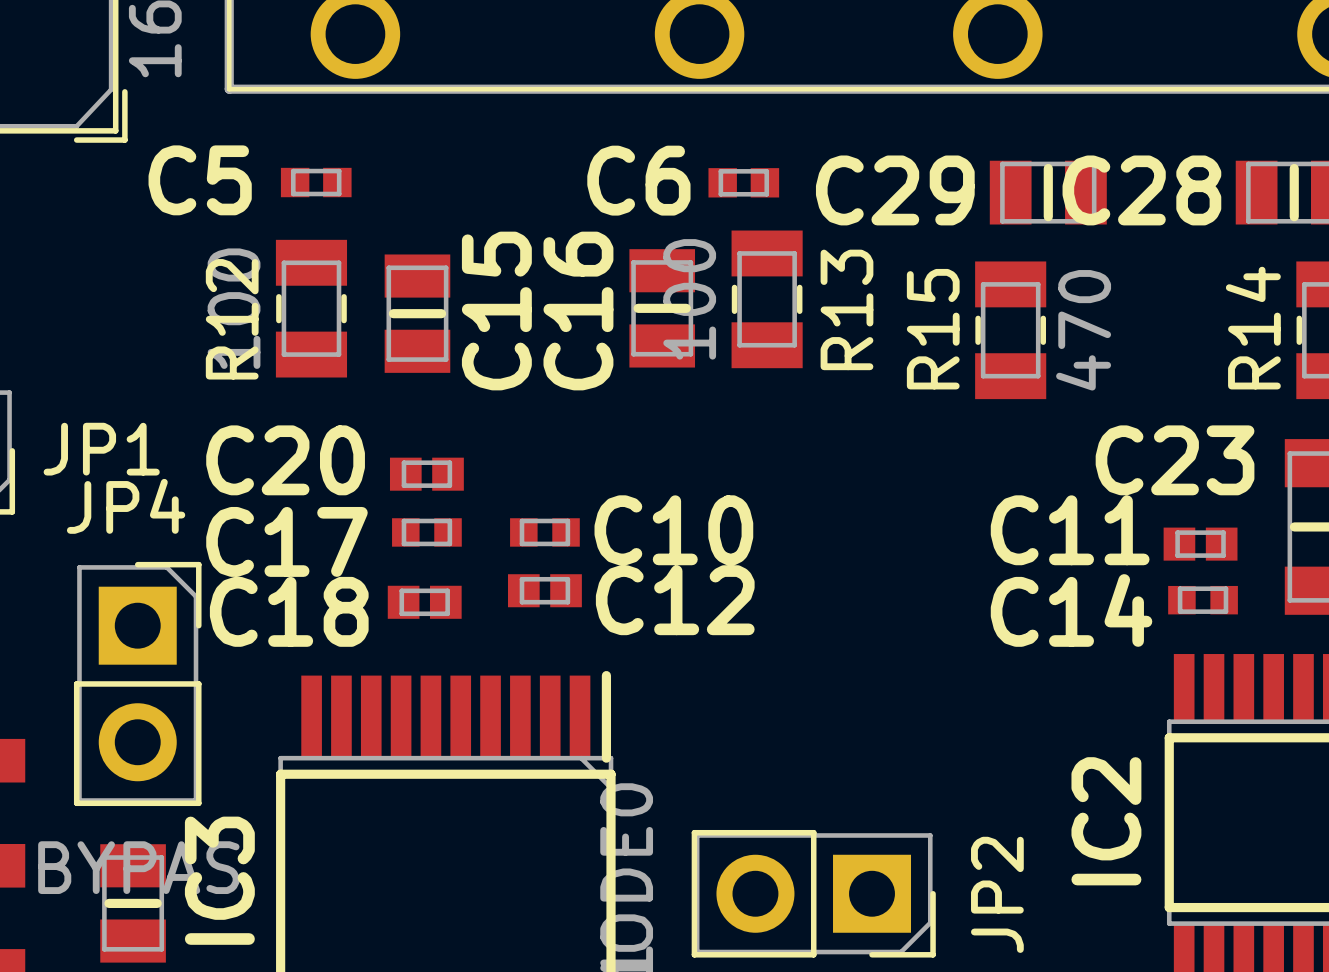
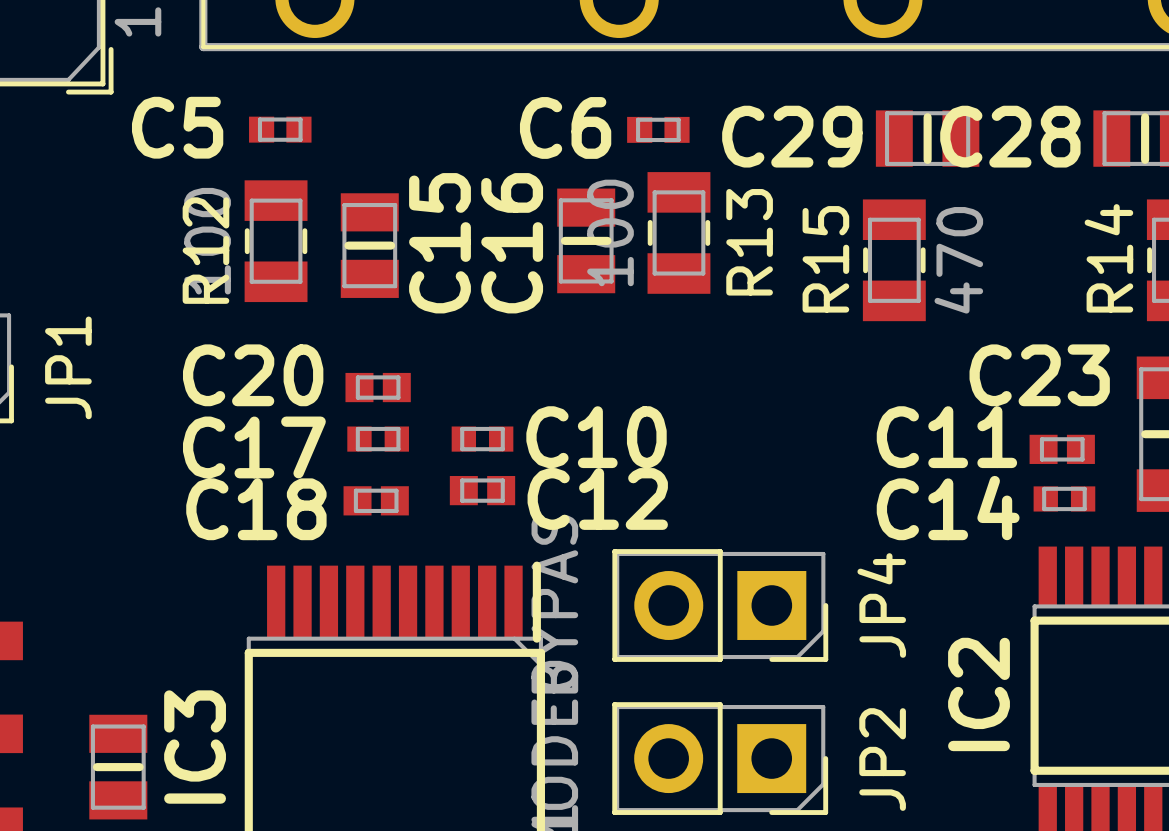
JP1 name rotation: 0° (101, 449) -> 90° counterclockwise (68, 367)
JP4 rotation: 0° (137, 683) -> 90° clockwise (720, 605)
JP4 position: (137, 683) -> (720, 605)

